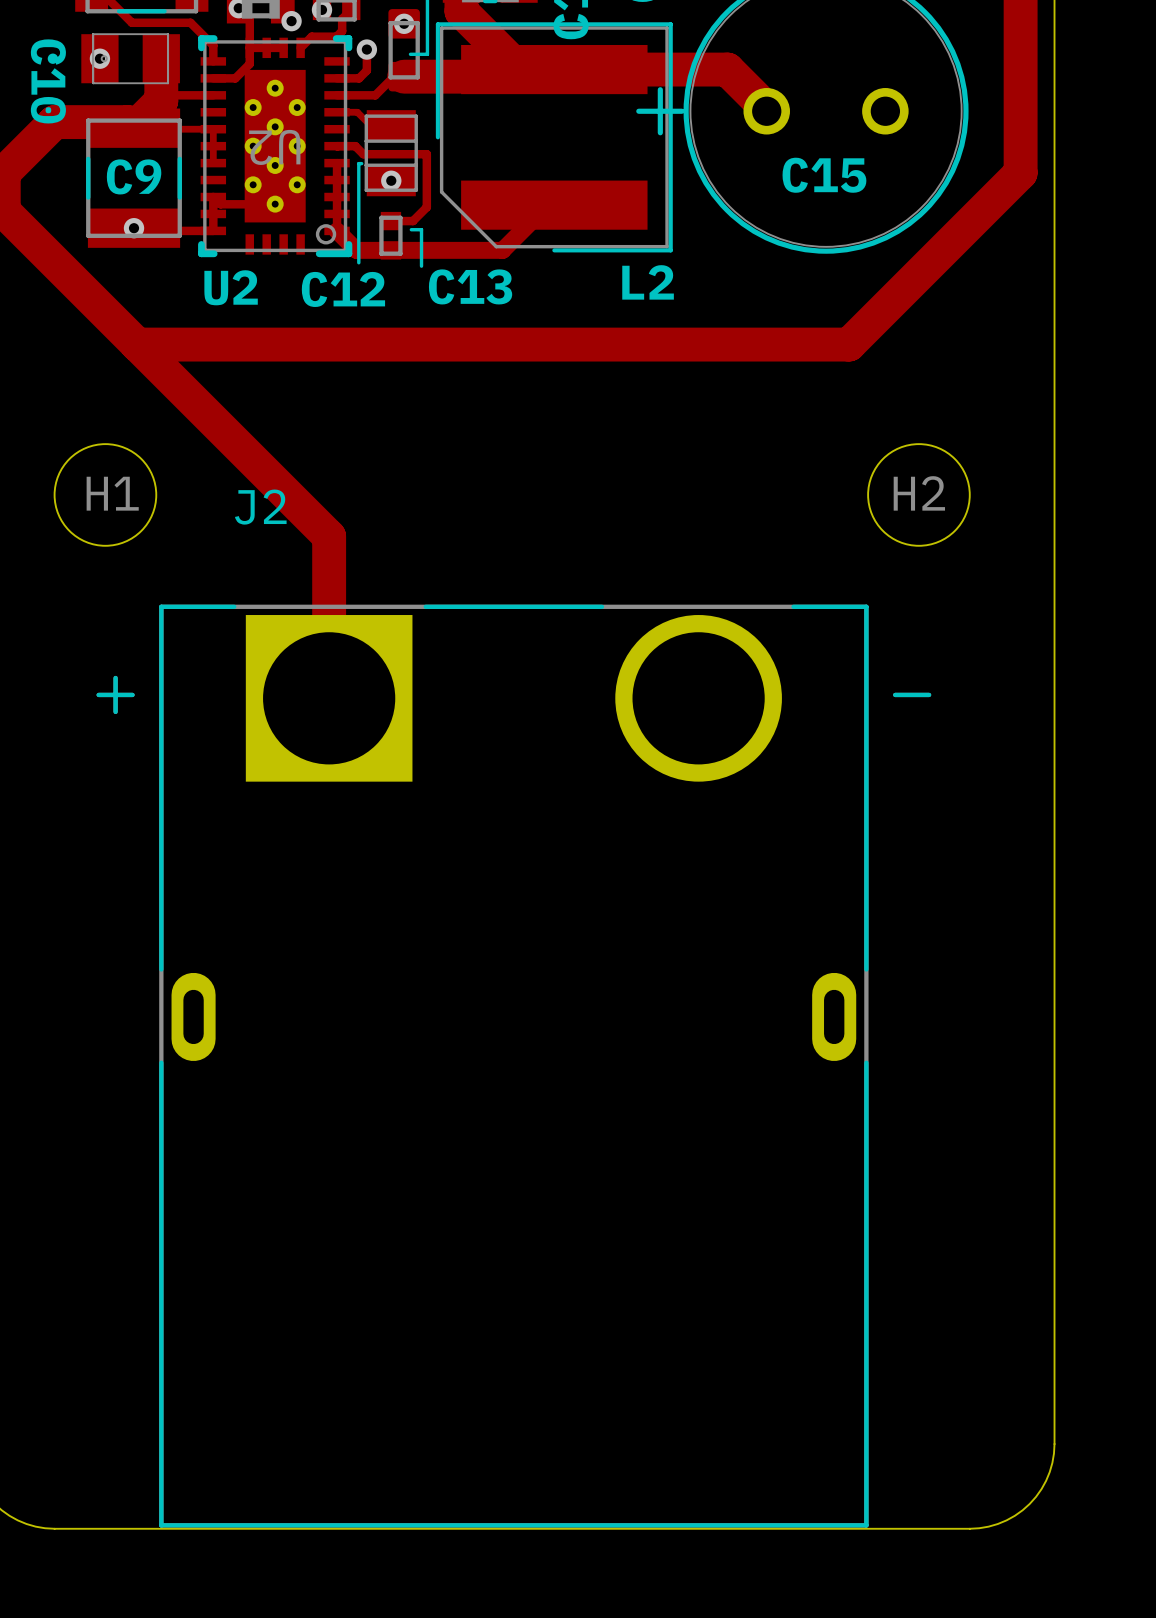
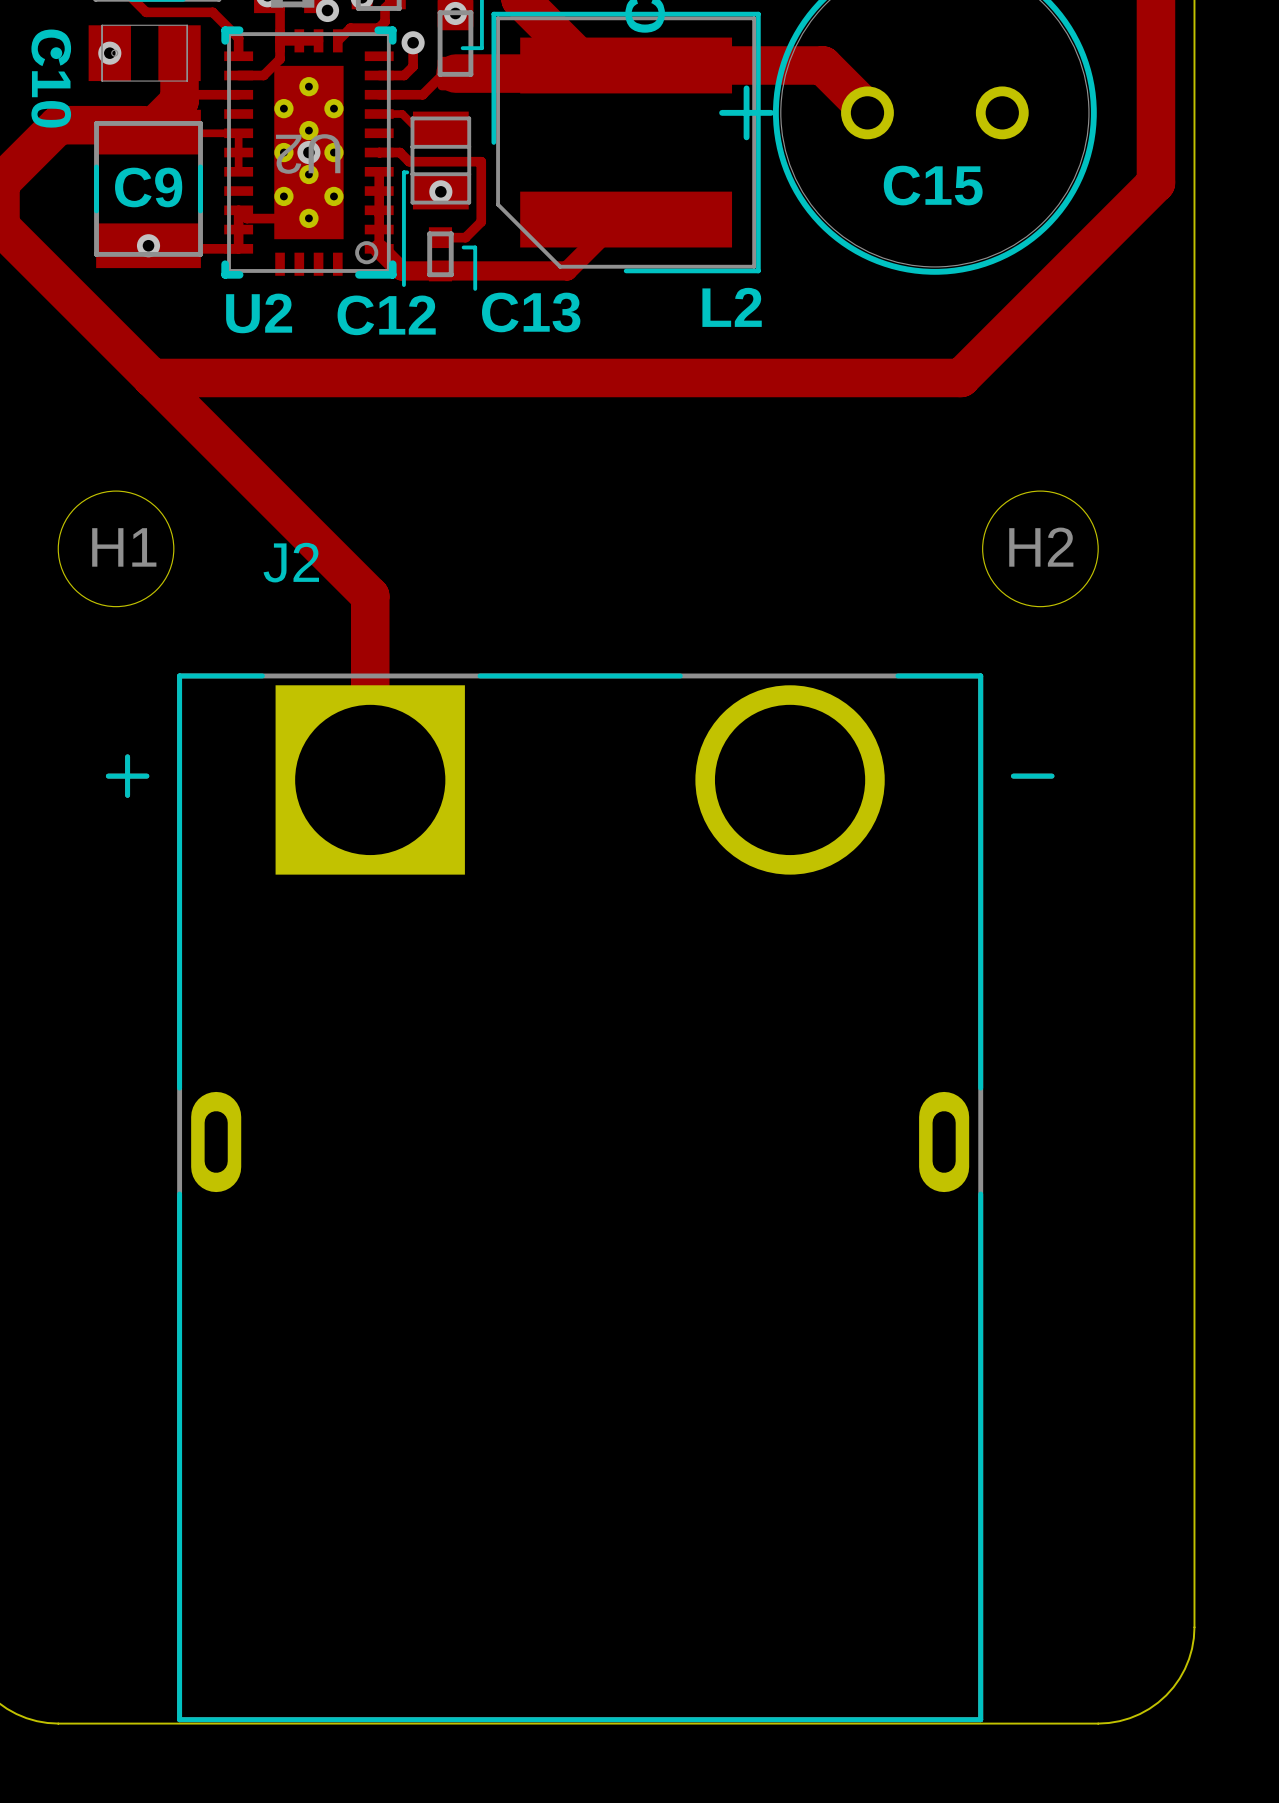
via: none -> (308, 152)

